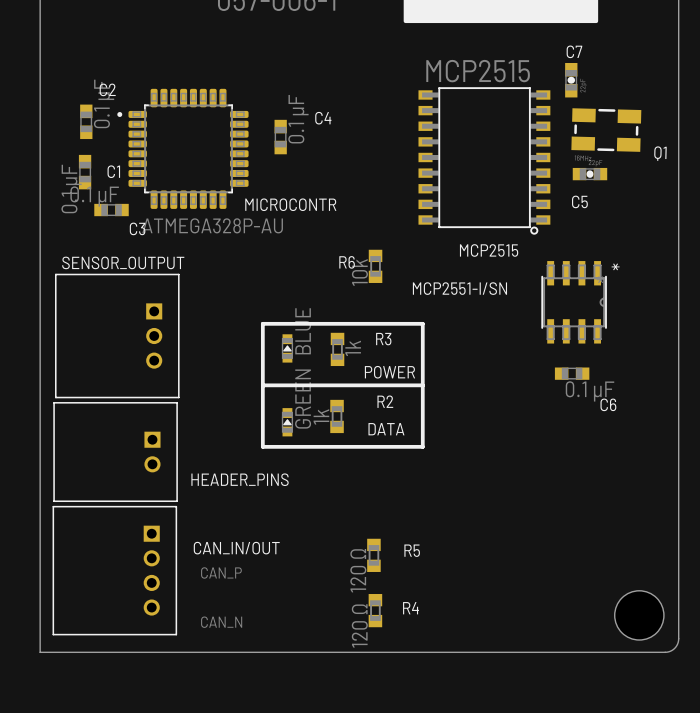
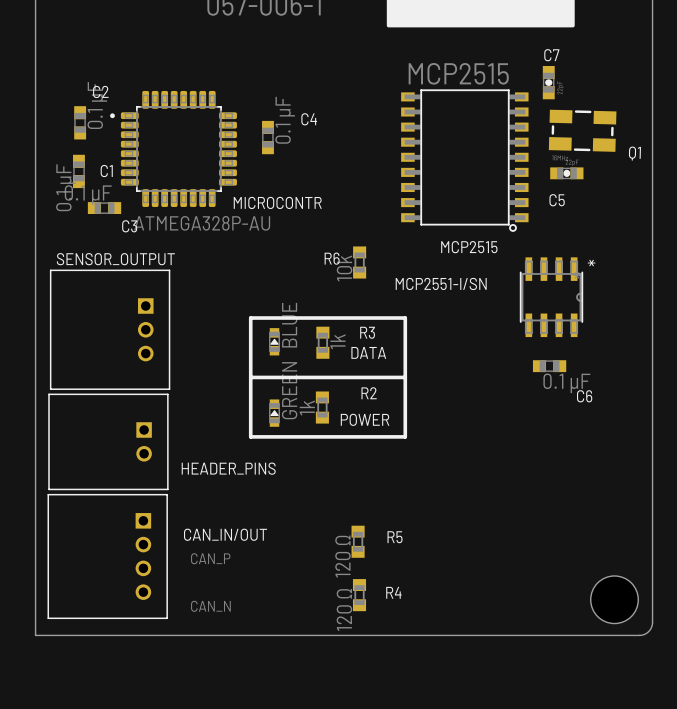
POWER name: POWER (389, 372) -> DATA (368, 352)
DATA name: DATA (386, 429) -> POWER (365, 419)

